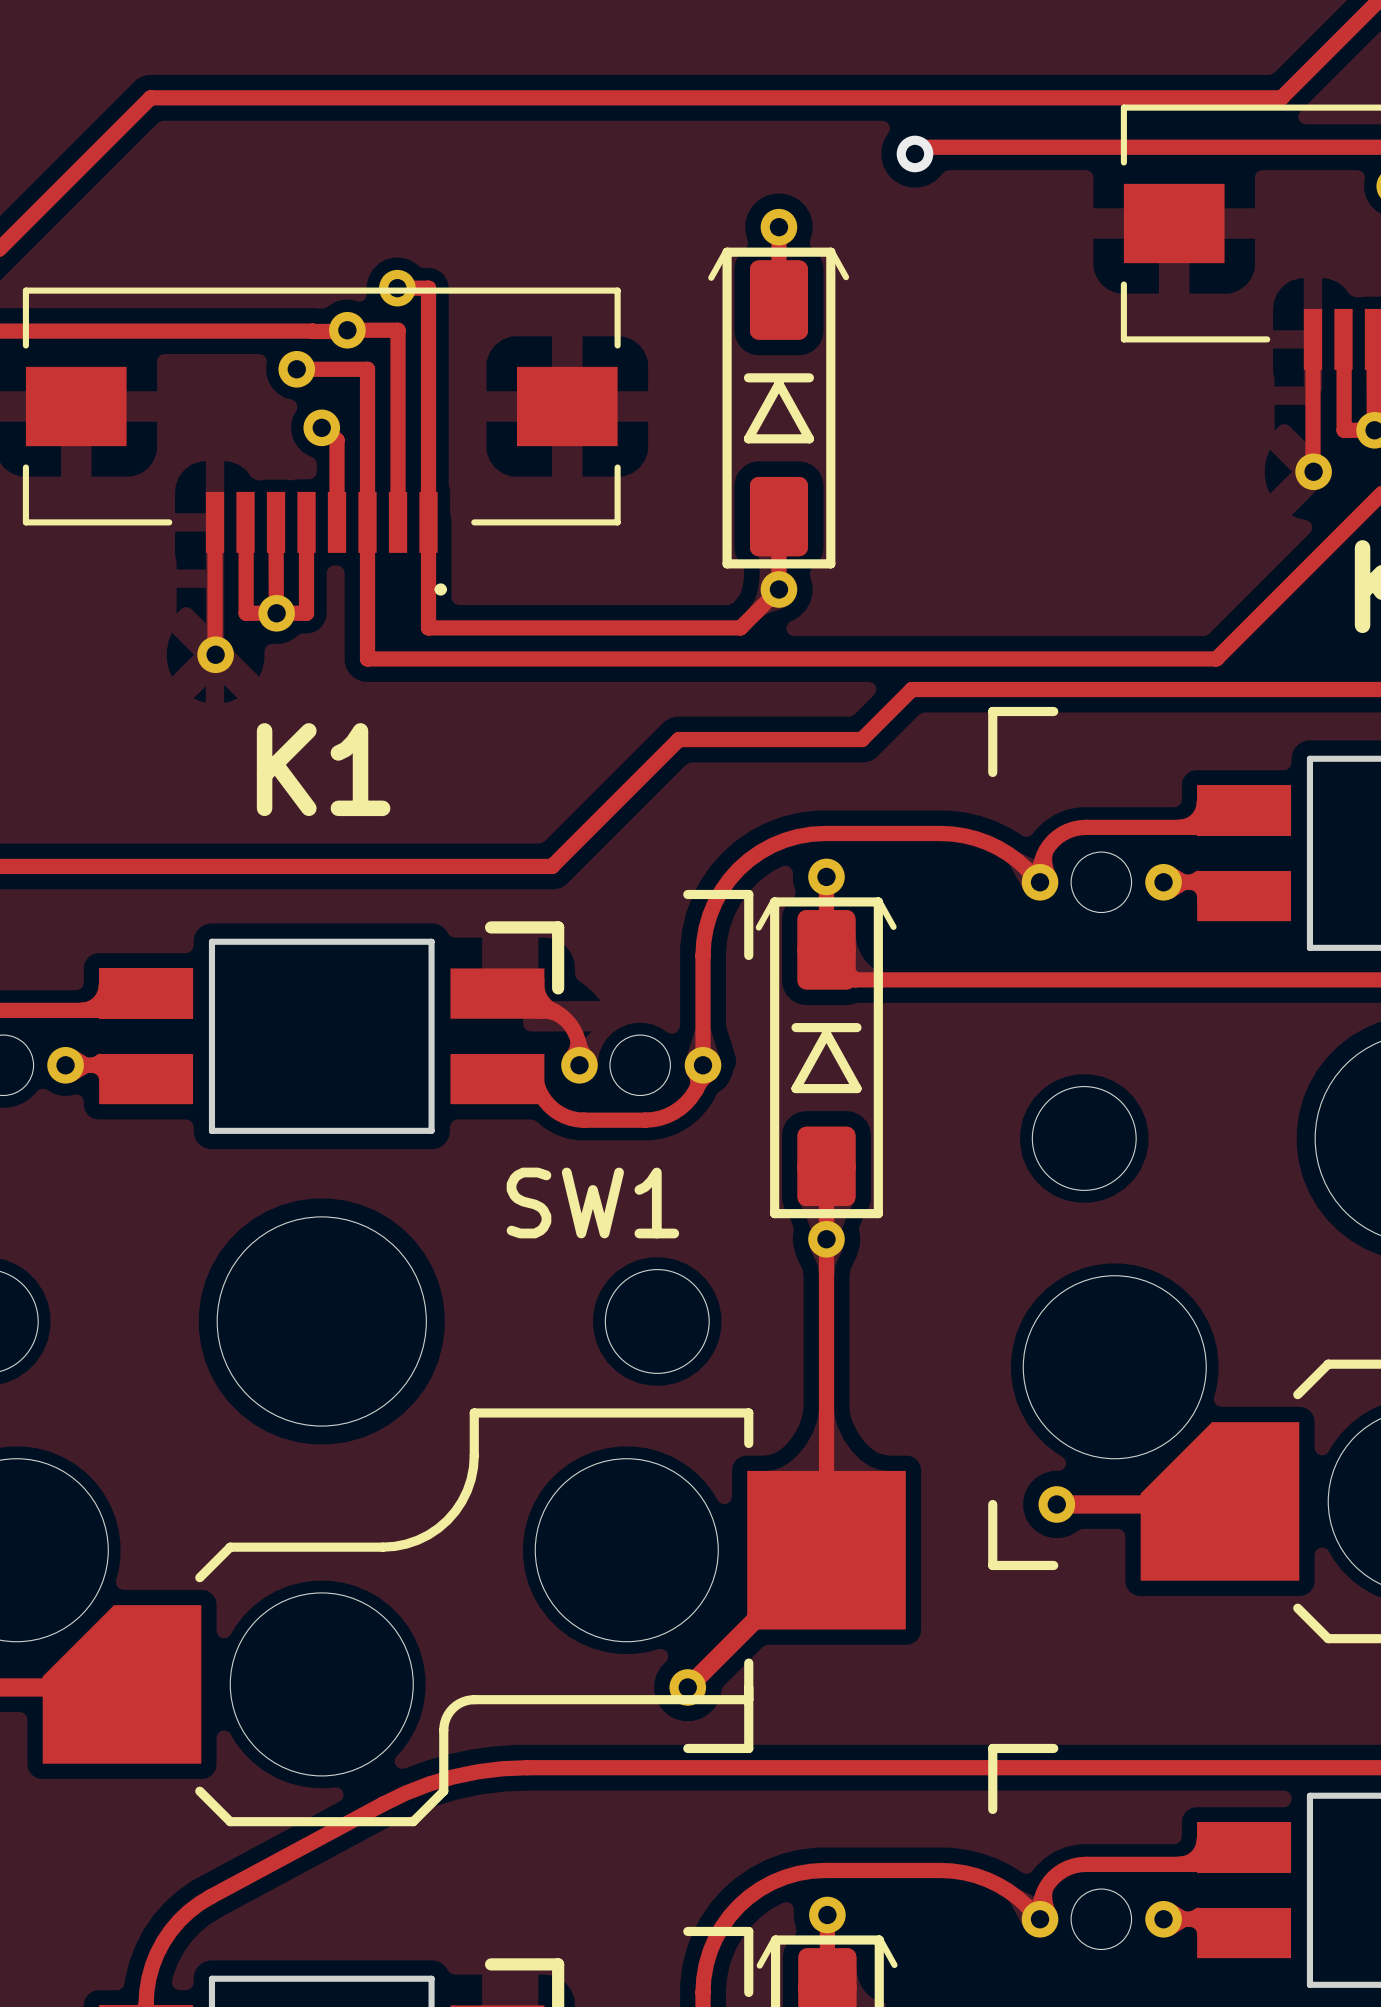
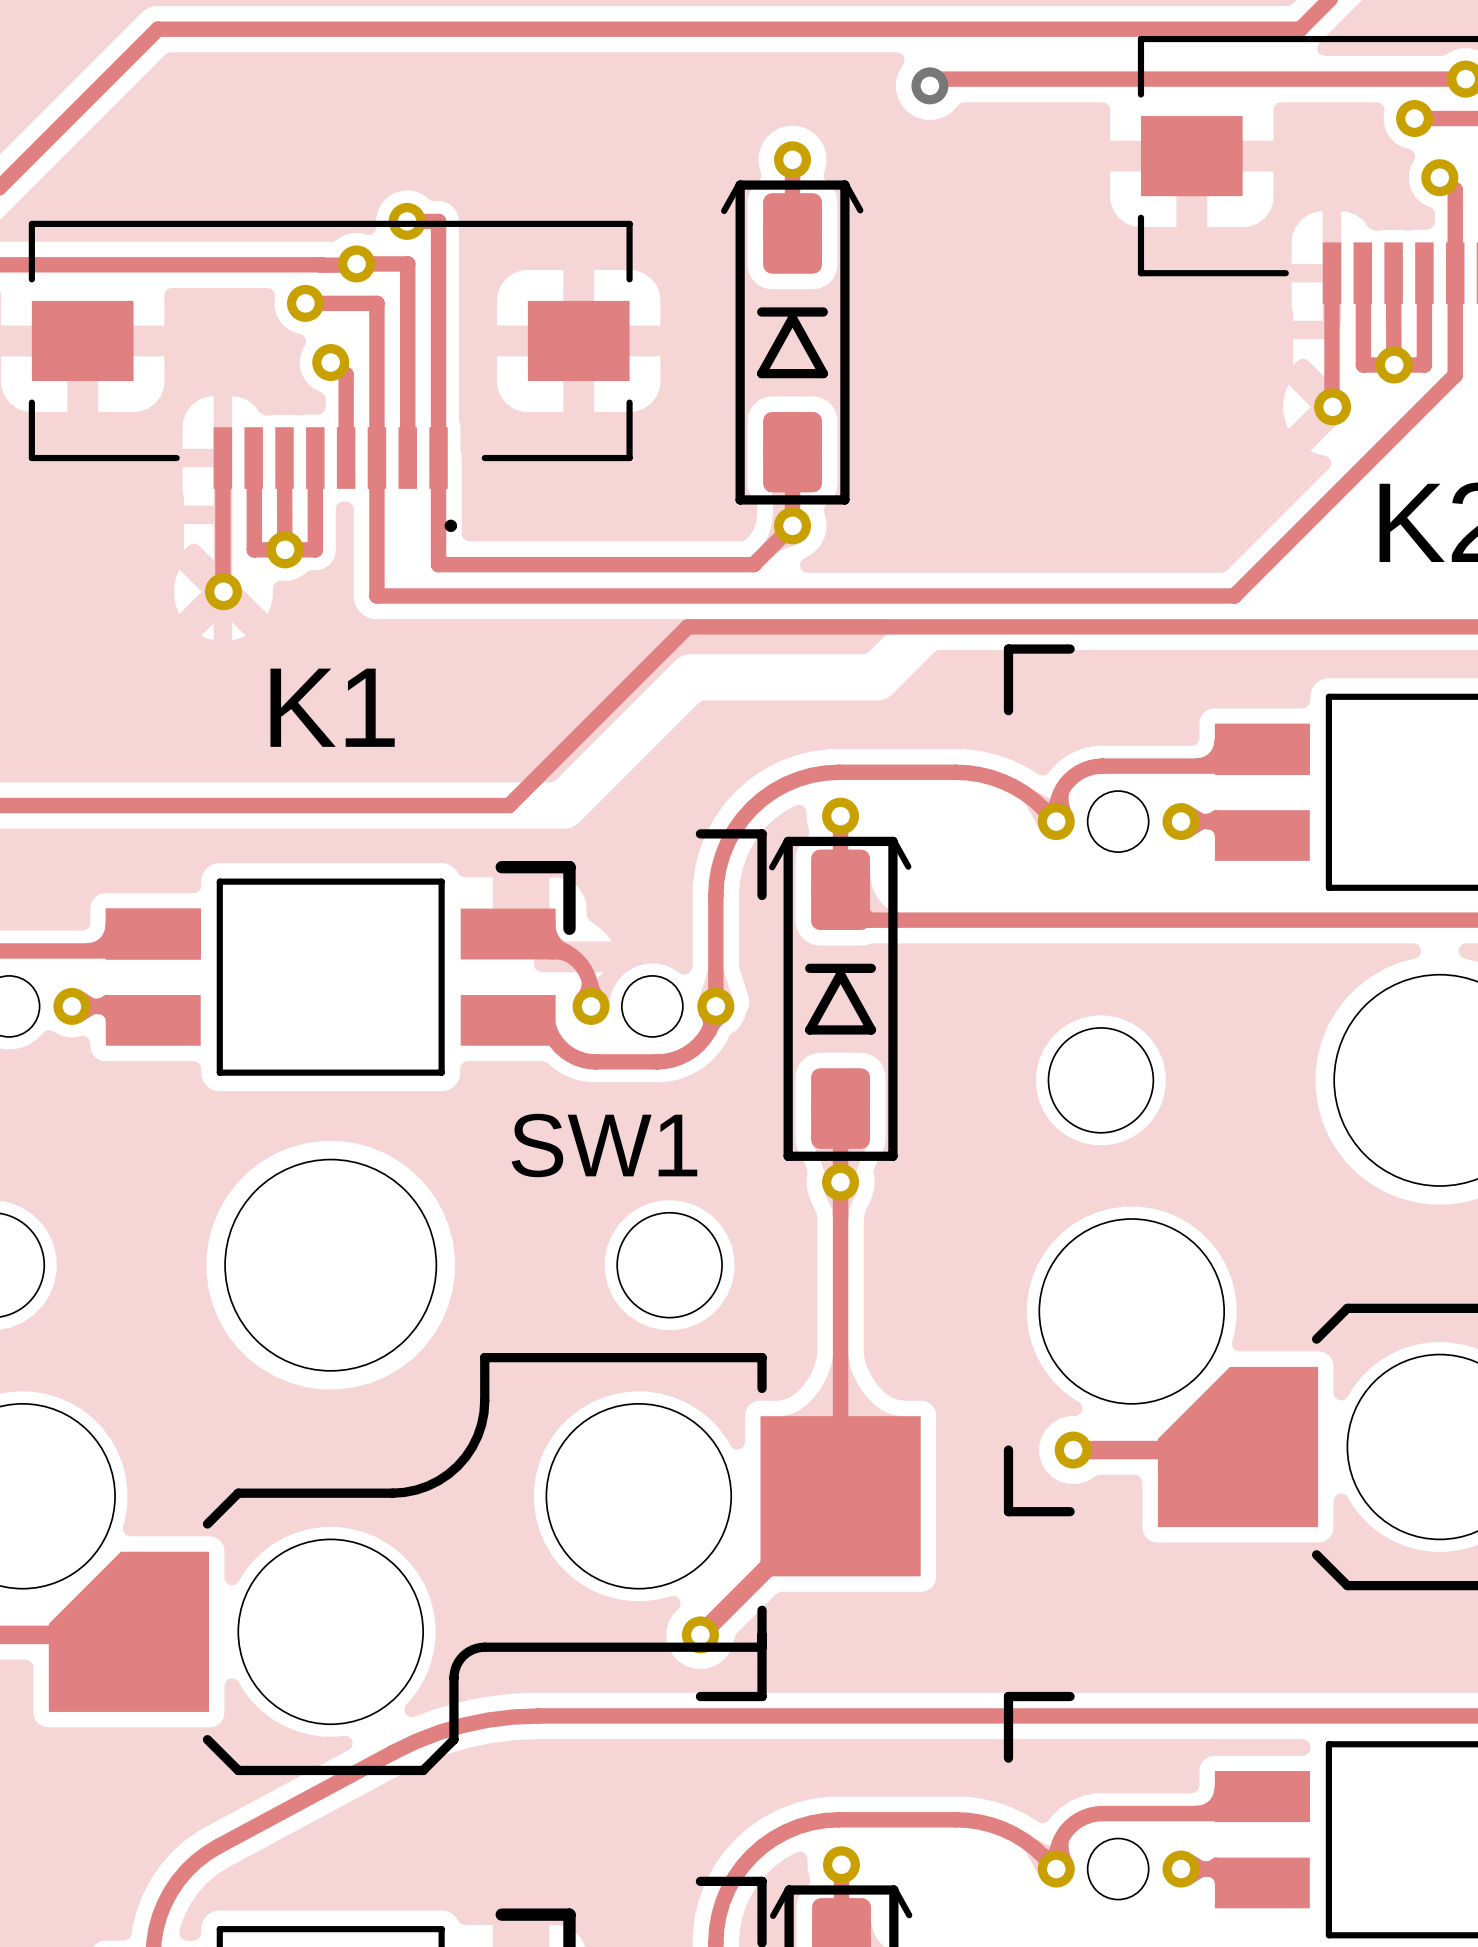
track: (911, 689) (861, 739) (678, 739) (552, 866) (498, 866) -> (926, 626) (687, 626) (509, 805)

